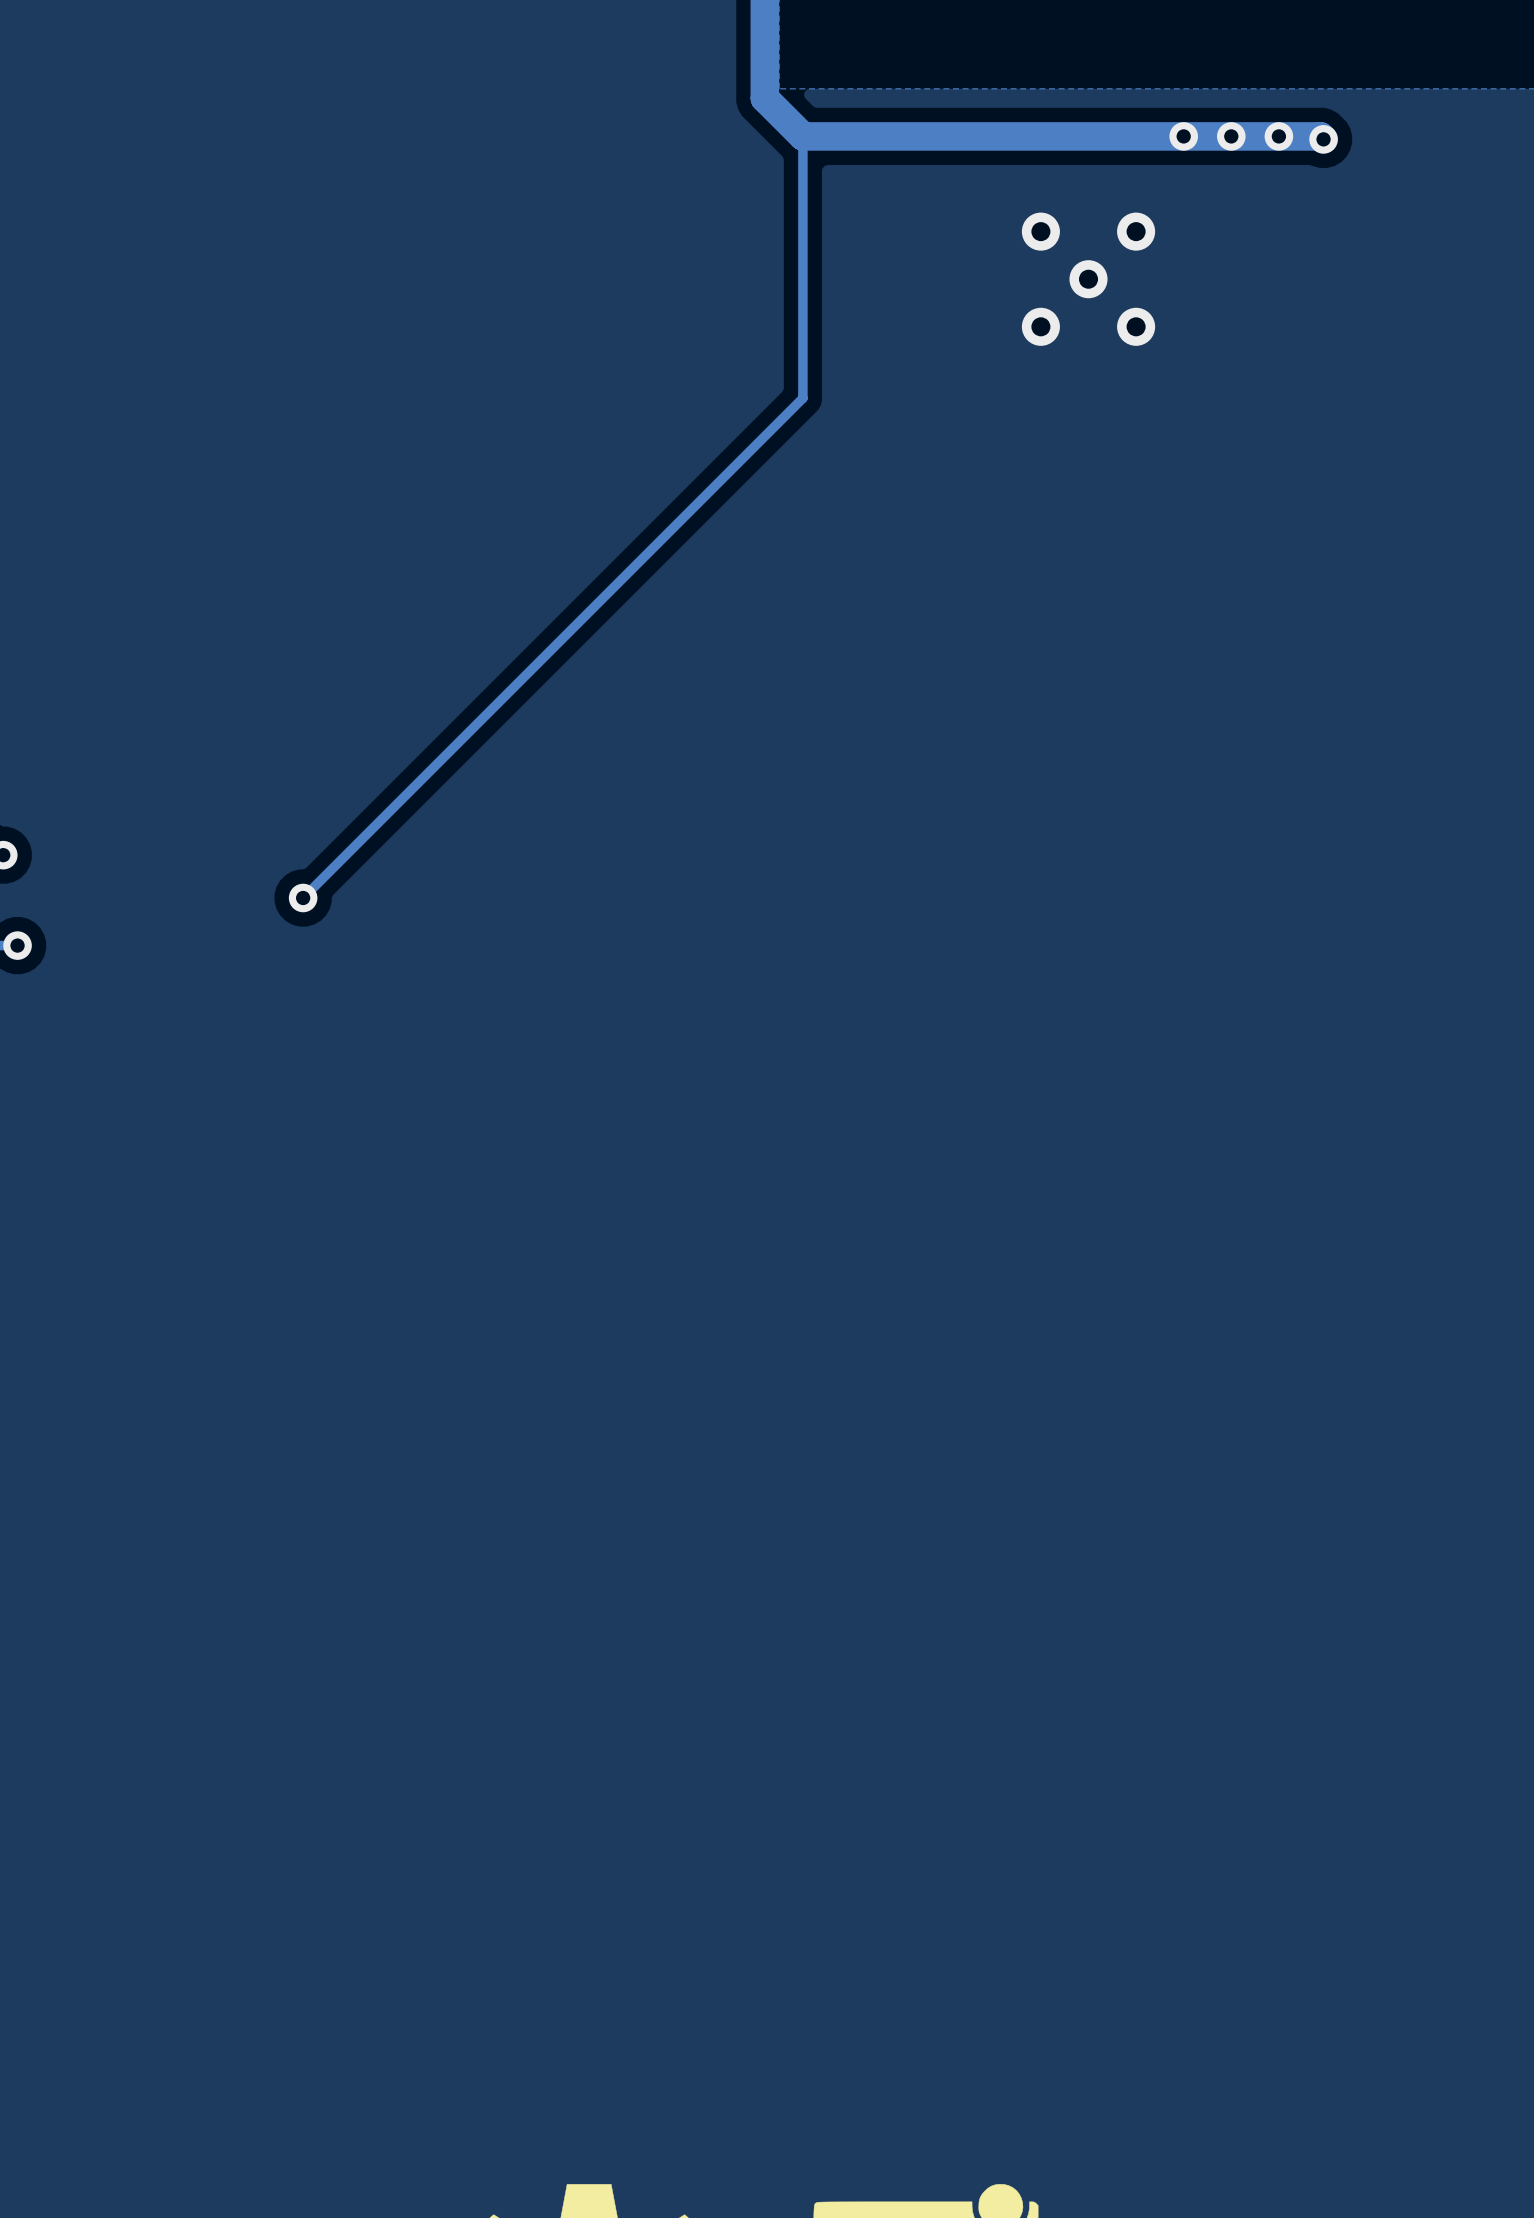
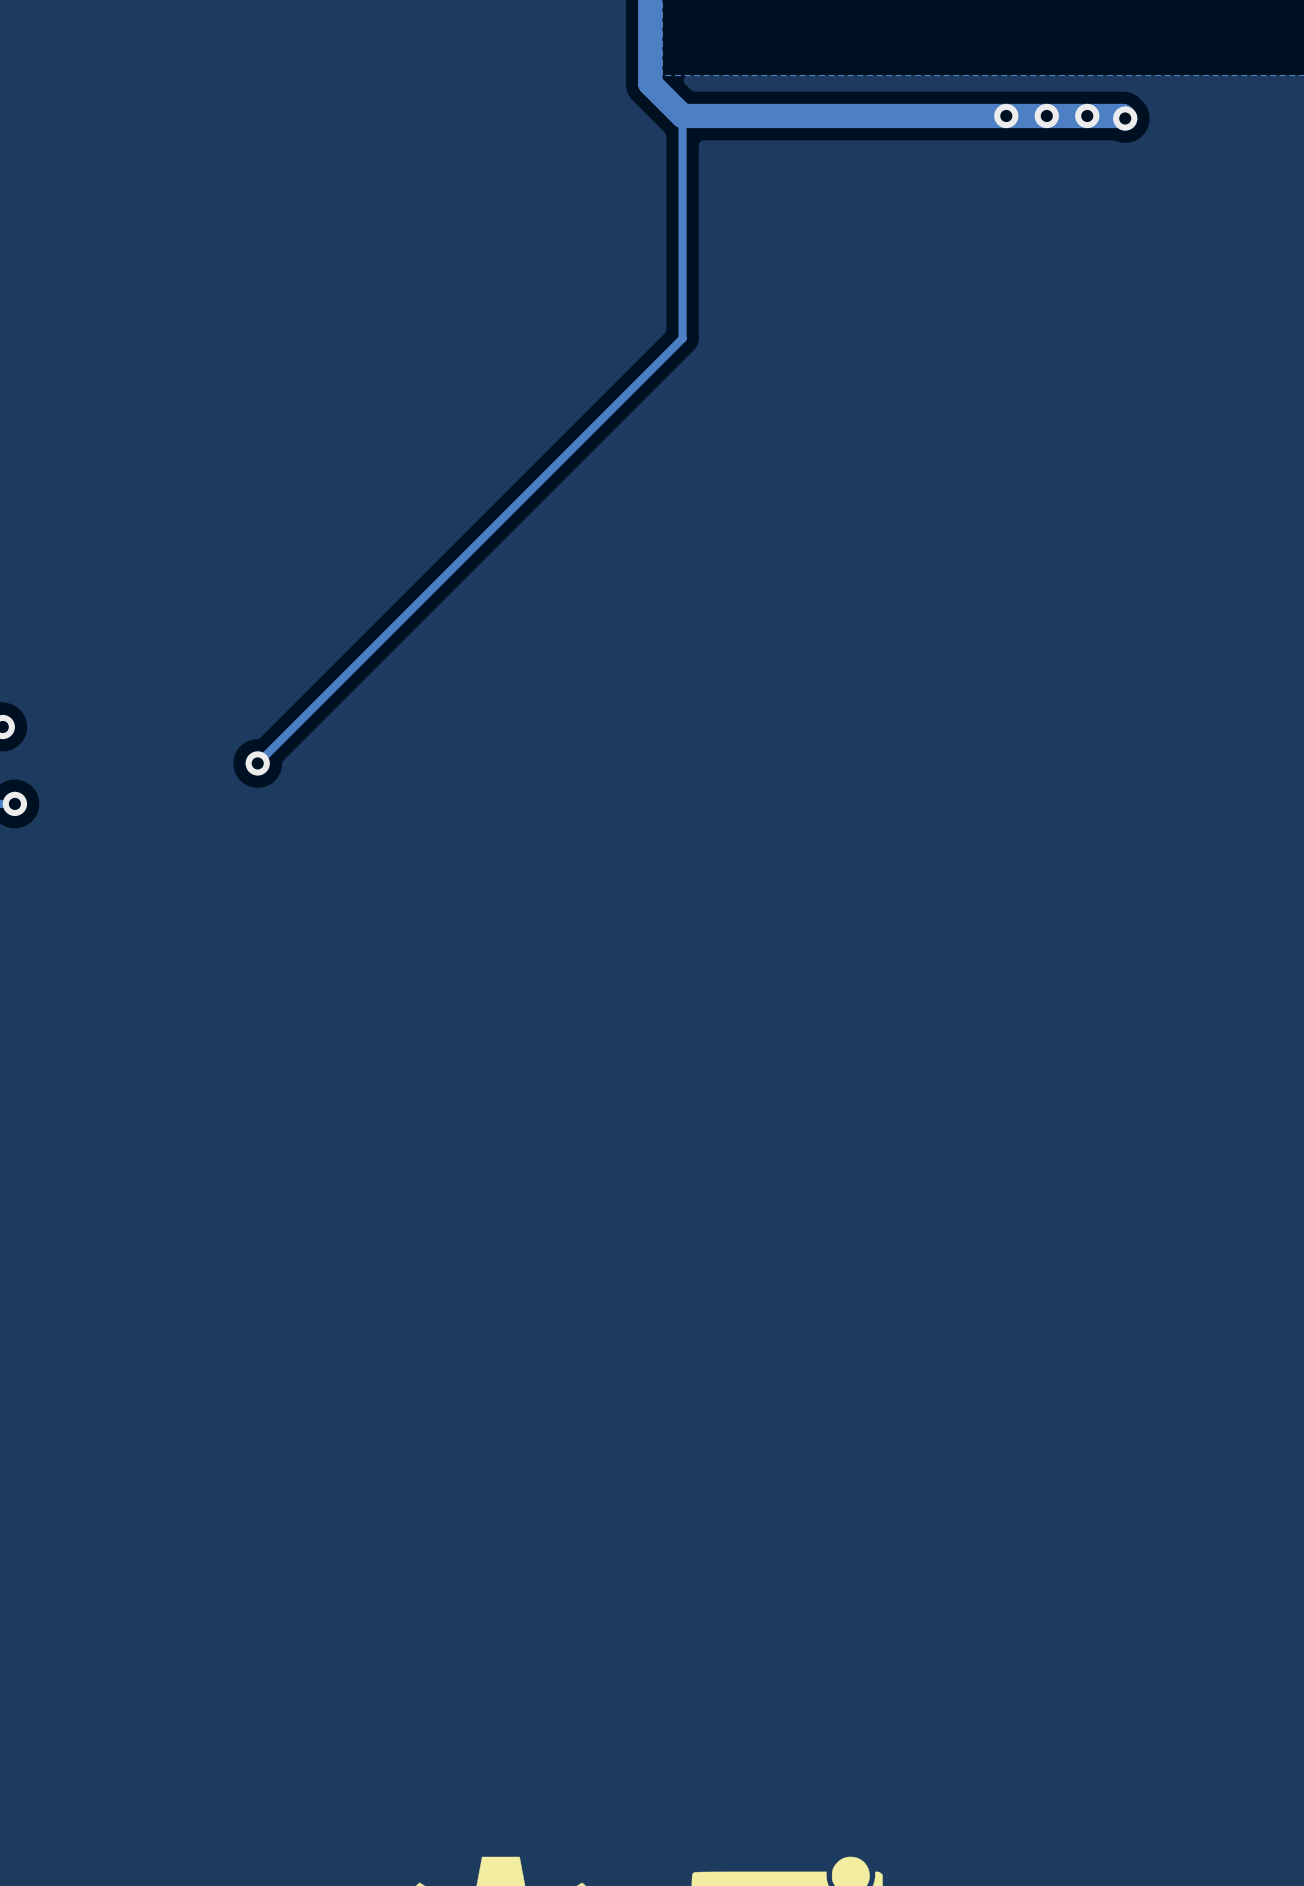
via: (1040, 231) -> none
via: (1136, 231) -> none
via: (1088, 279) -> none
via: (1040, 326) -> none
via: (1136, 326) -> none

